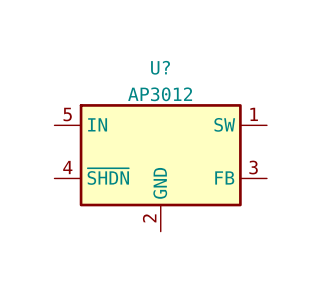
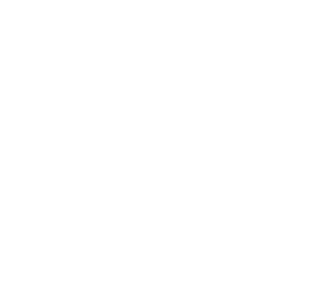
U?: AP3012 (160, 167) -> none

